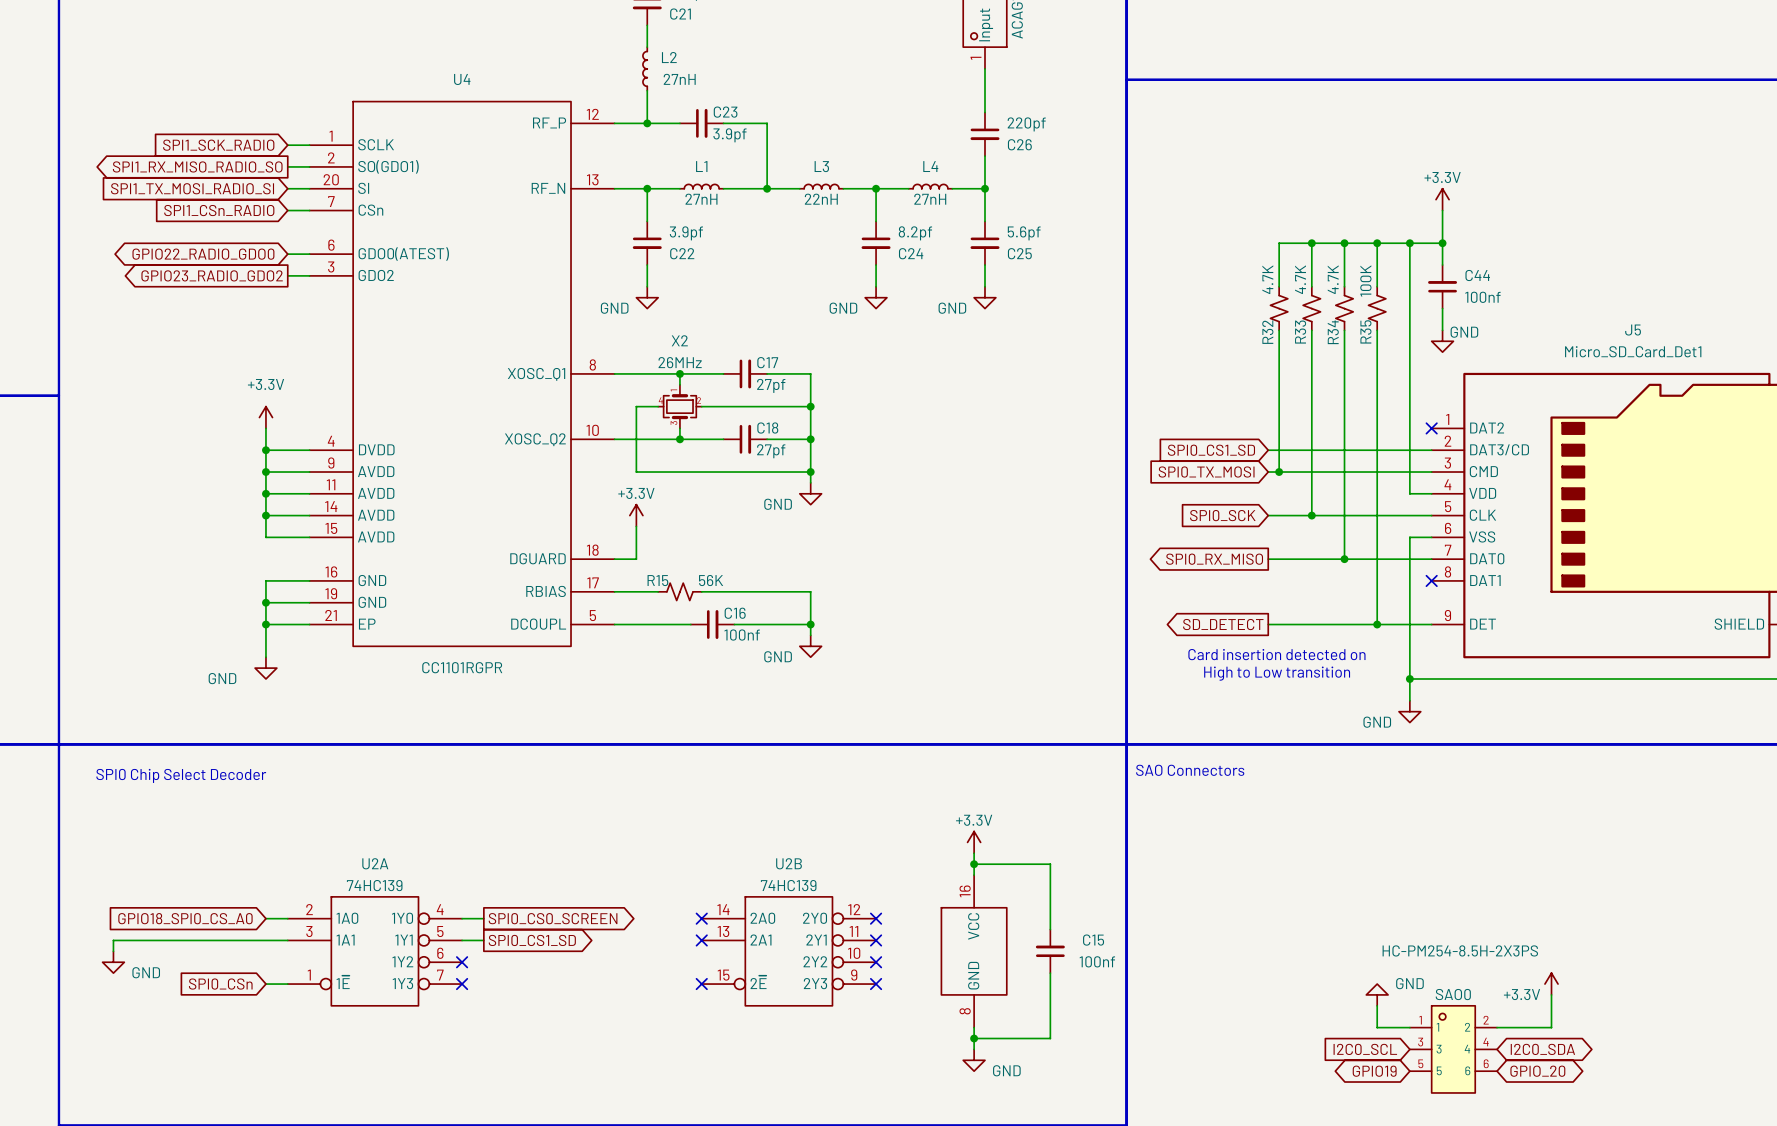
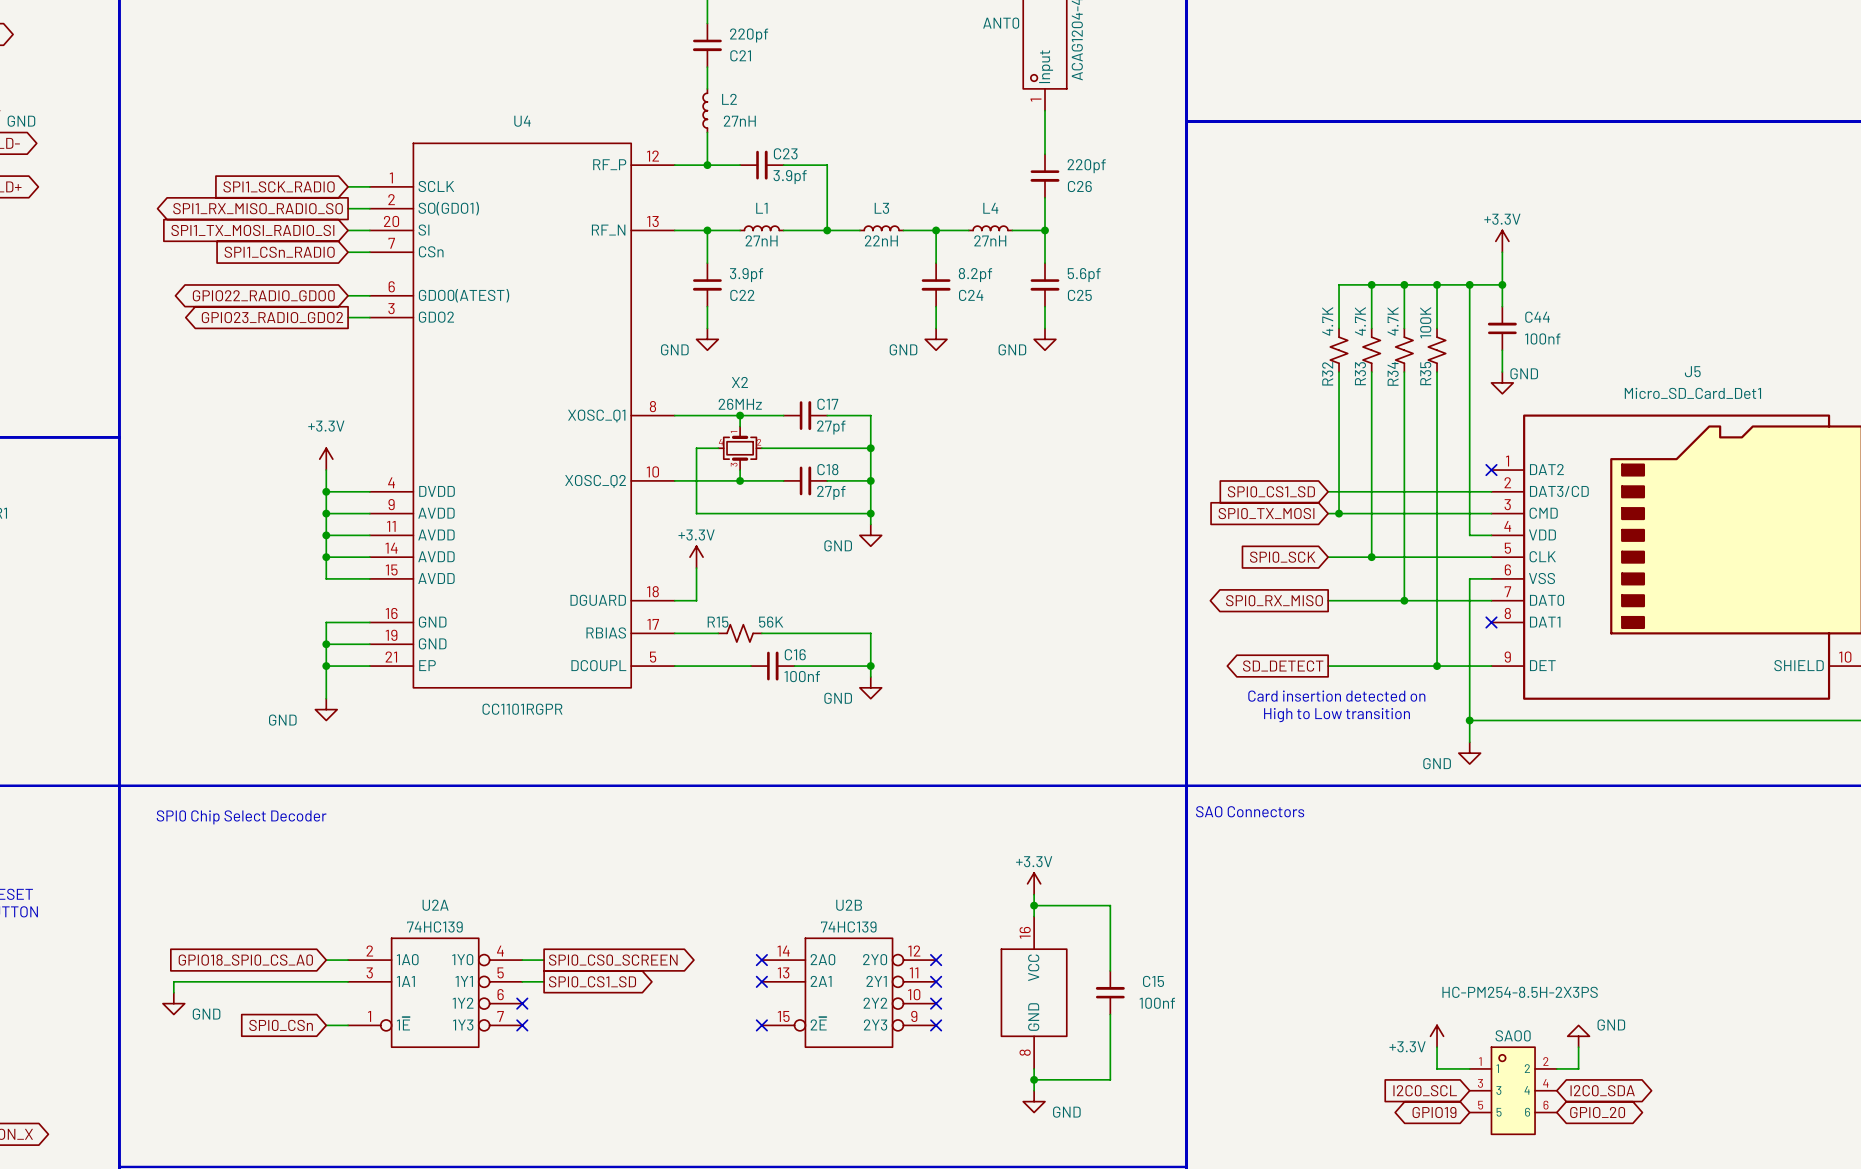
power symbol: +3.3V (1551, 984) -> none
power symbol: GND (1377, 994) -> +3.3V (1437, 1036)
power symbol: none -> GND (1578, 1036)
wire: (1551, 994) (1551, 1027) (1518, 1027) -> (1578, 1047) (1578, 1068)

